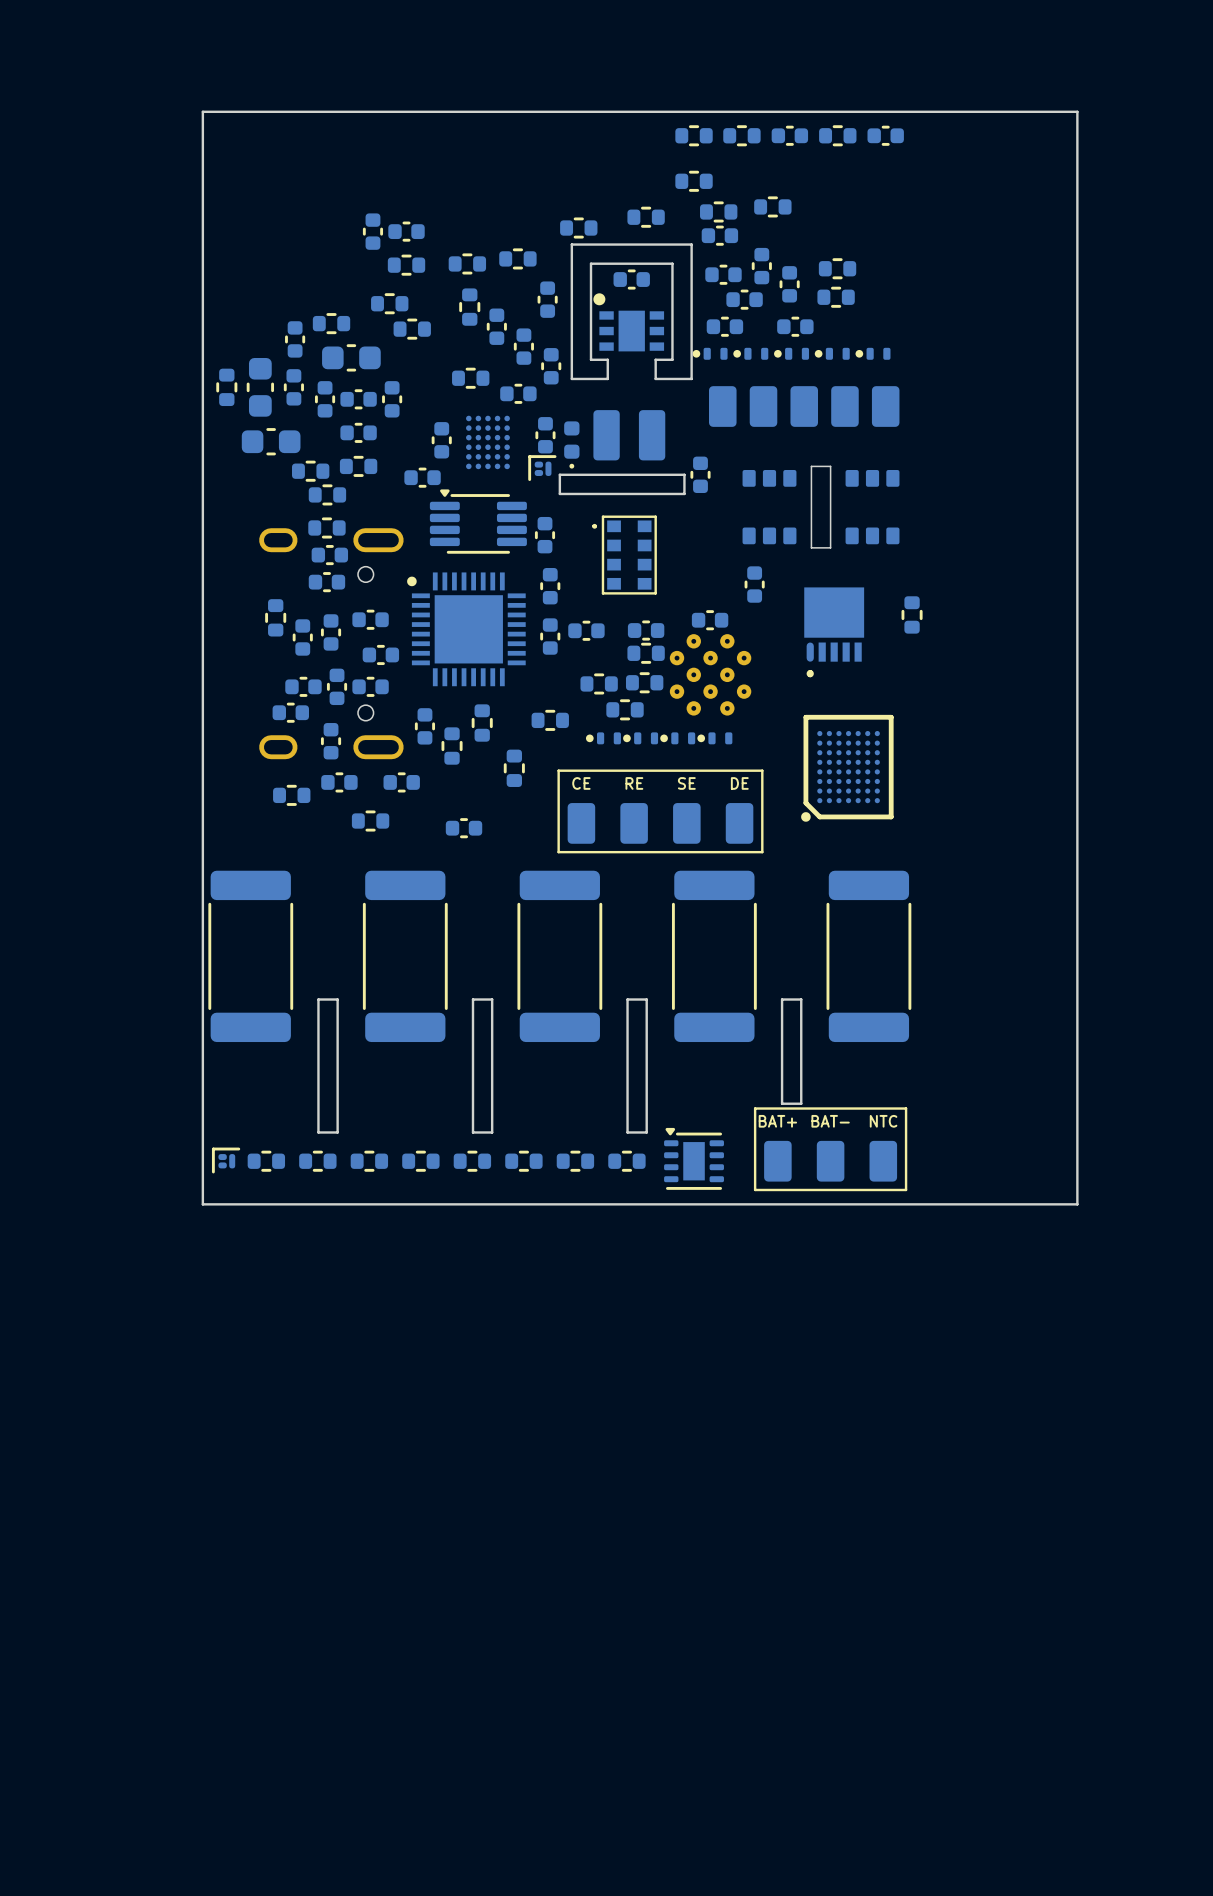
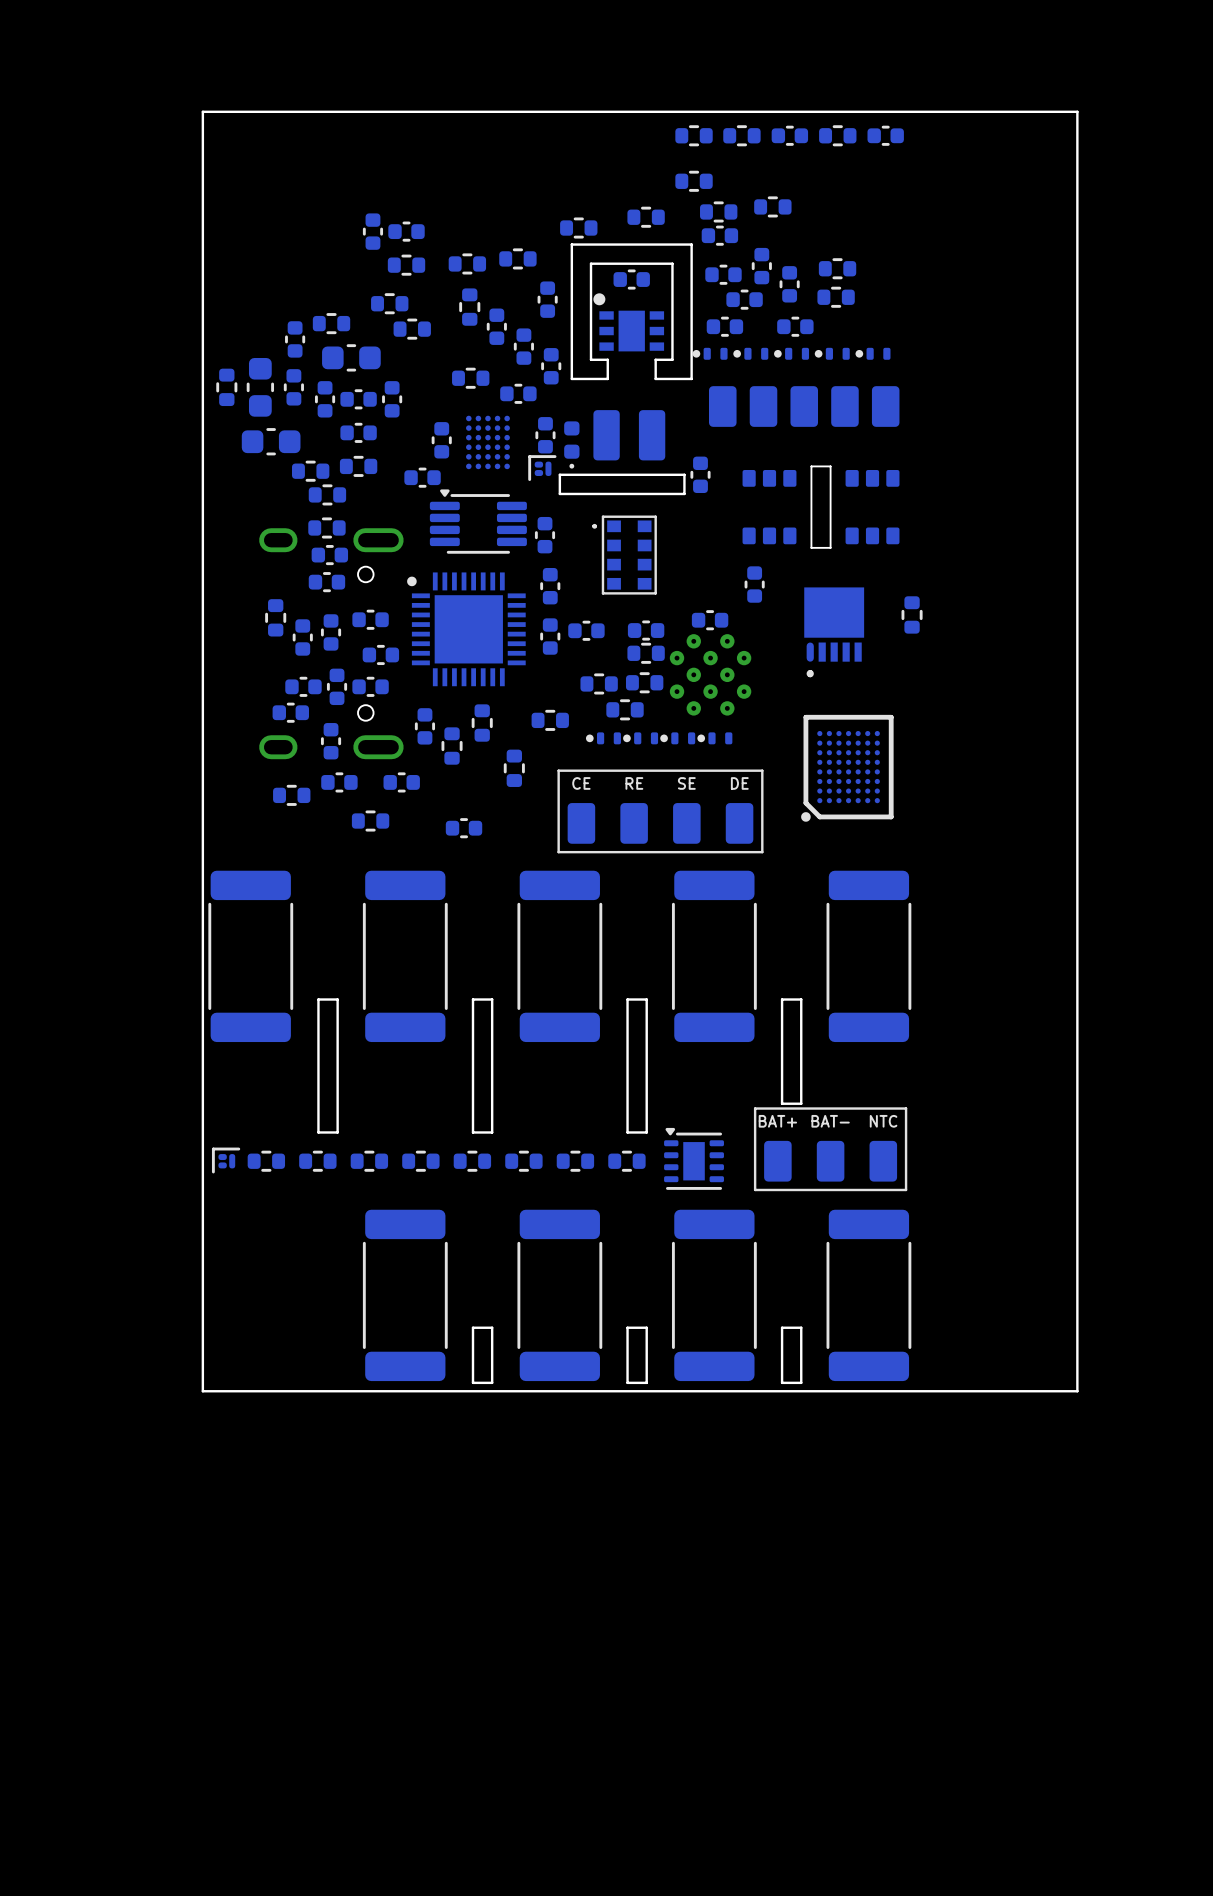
board edge: (1077, 1204) (202, 1204) -> (1077, 1204) (1077, 1391) (202, 1391) (202, 1204)
part: none -> (405, 1295)
part: none -> (559, 1295)
part: none -> (714, 1295)
part: none -> (868, 1295)
board edge: none -> (492, 1327) (473, 1327) (473, 1382) (492, 1382) (492, 1327)
board edge: none -> (646, 1327) (627, 1327) (627, 1382) (646, 1382) (646, 1327)
board edge: none -> (801, 1327) (801, 1382) (782, 1382) (782, 1327) (801, 1327)

